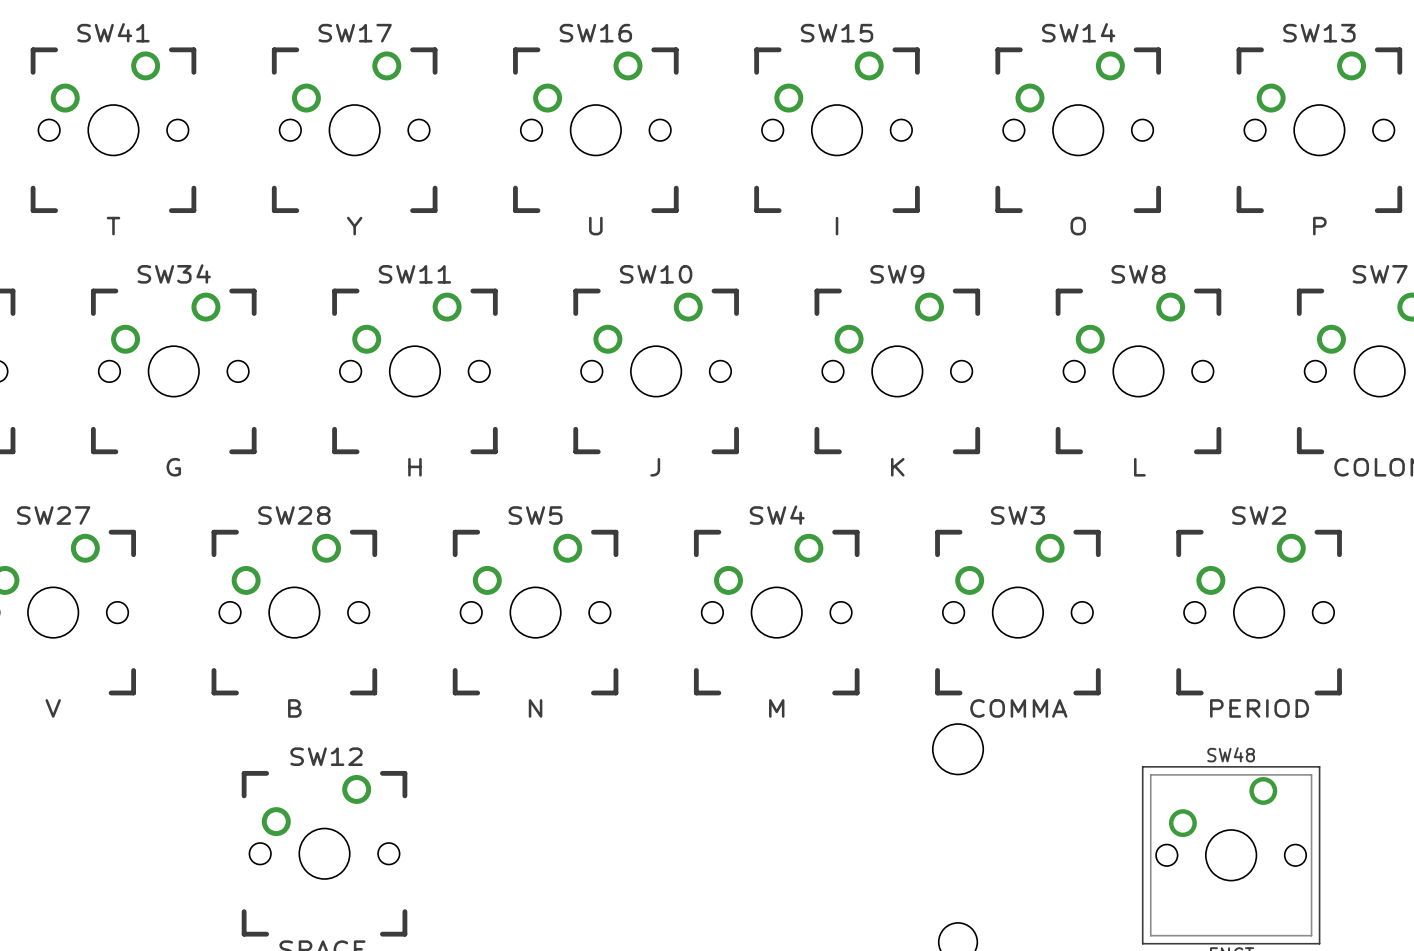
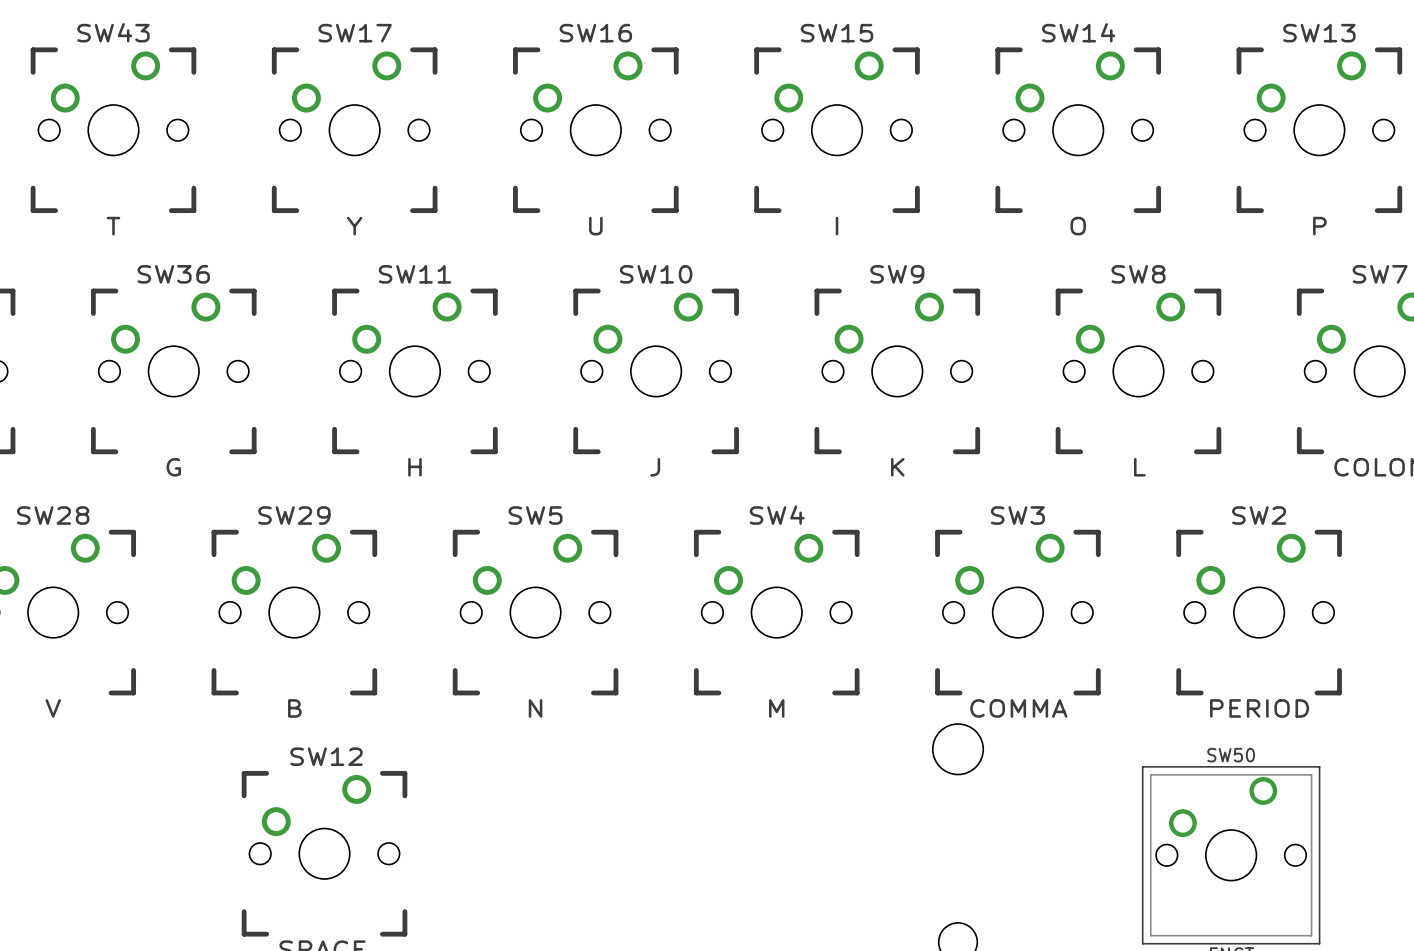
SW41 name: SW41 (113, 32) -> SW43 (113, 32)
SW34 name: SW34 (174, 273) -> SW36 (173, 274)
SW27 name: SW27 (53, 515) -> SW28 (53, 515)
SW28 name: SW28 (294, 515) -> SW29 (294, 515)
SW48 name: SW48 (1231, 754) -> SW50 (1231, 755)

